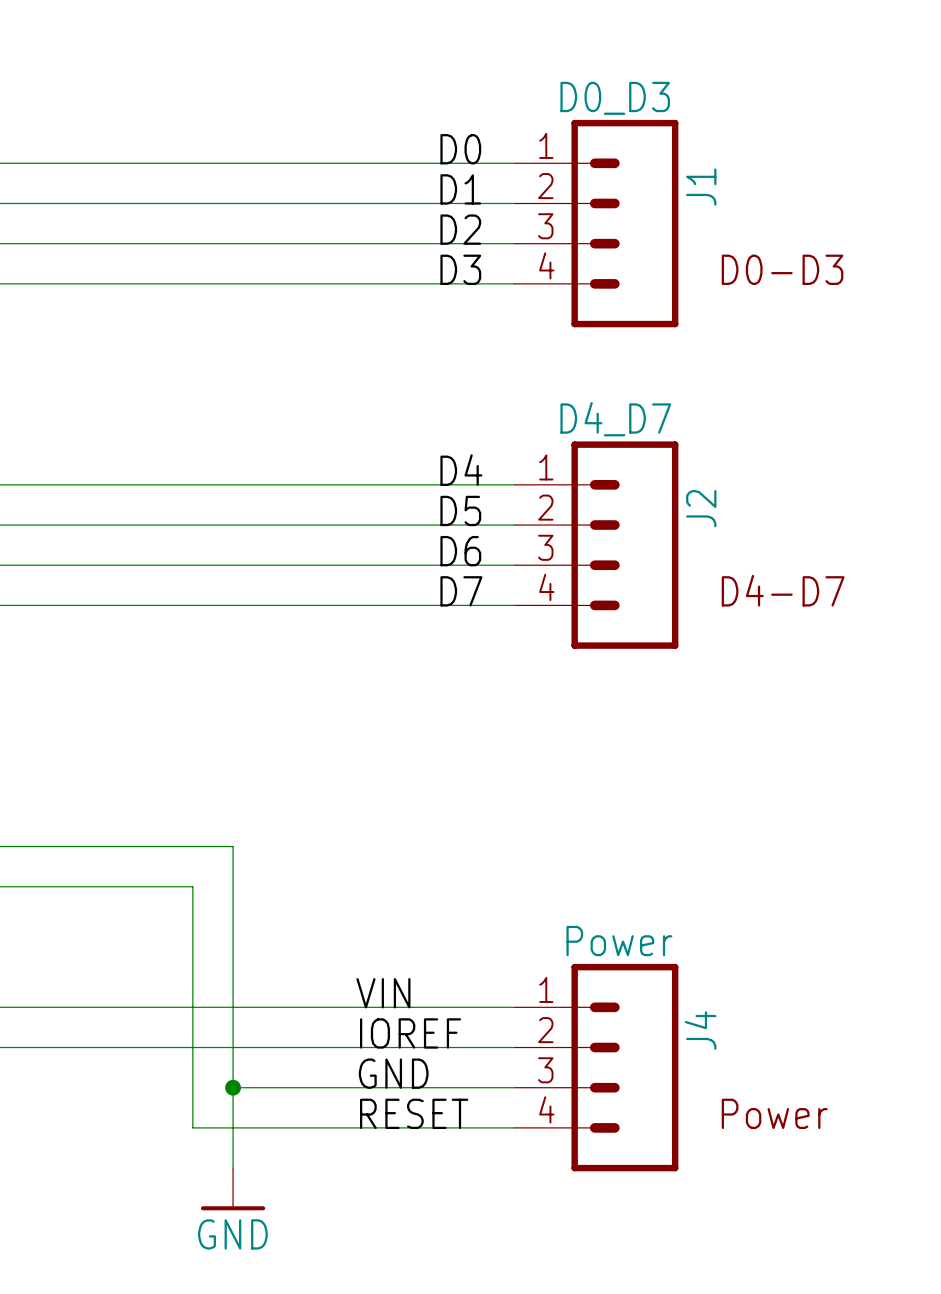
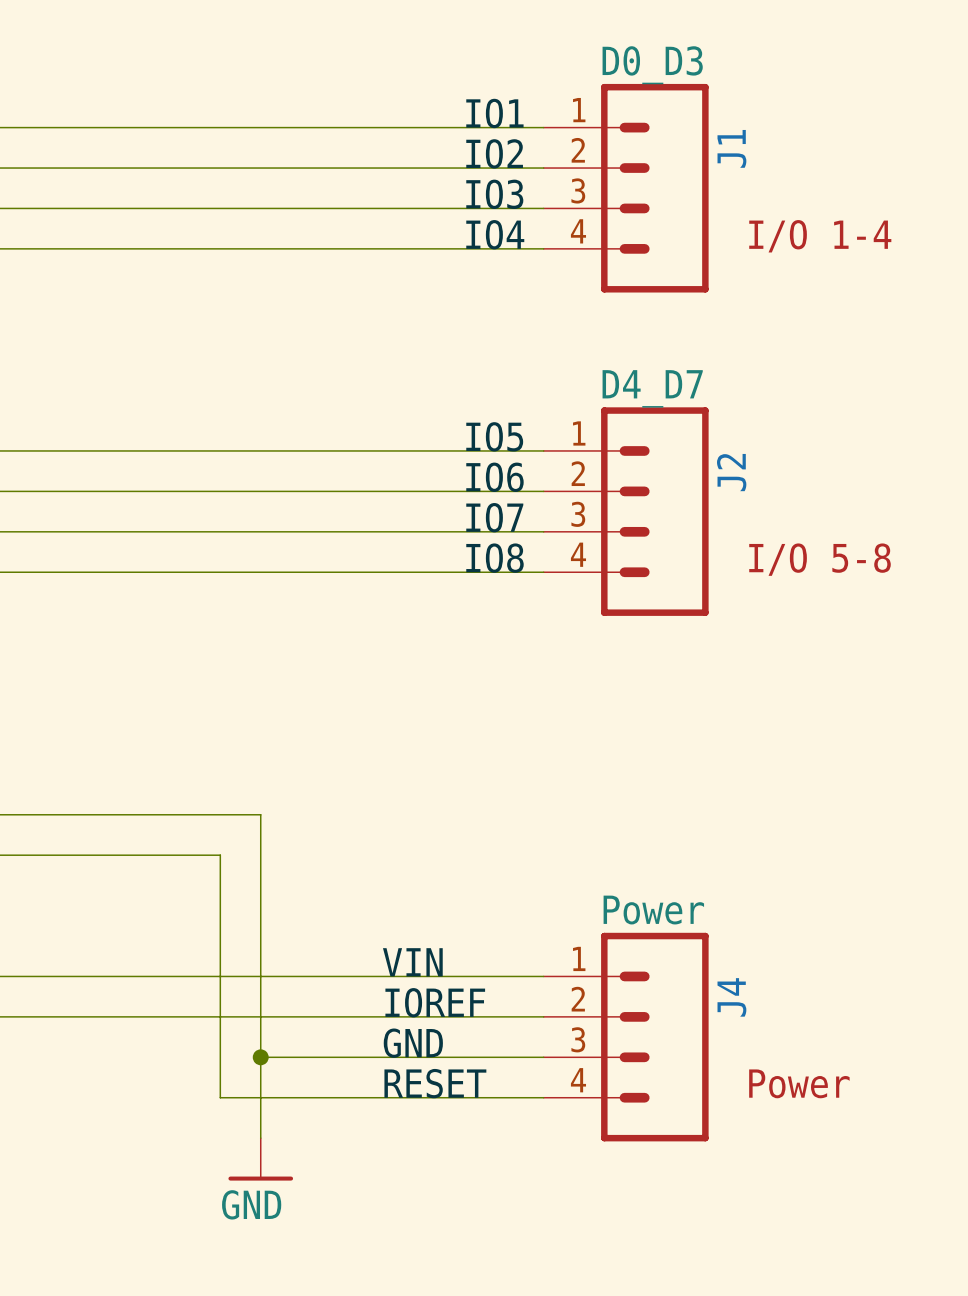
label: D0 (460, 149) -> IO1 (494, 113)
label: D1 (460, 189) -> IO2 (494, 153)
label: D2 (460, 229) -> IO3 (494, 194)
label: D3 (460, 269) -> IO4 (495, 234)
text: D0-D3 (782, 269) -> I/O 1-4 (820, 236)
label: D4 (461, 470) -> IO5 (494, 436)
label: D5 (460, 510) -> IO6 (494, 477)
label: D6 (460, 551) -> IO7 (494, 517)
text: D4-D7 (783, 590) -> I/O 5-8 (820, 559)
label: D7 (461, 591) -> IO8 (494, 558)

